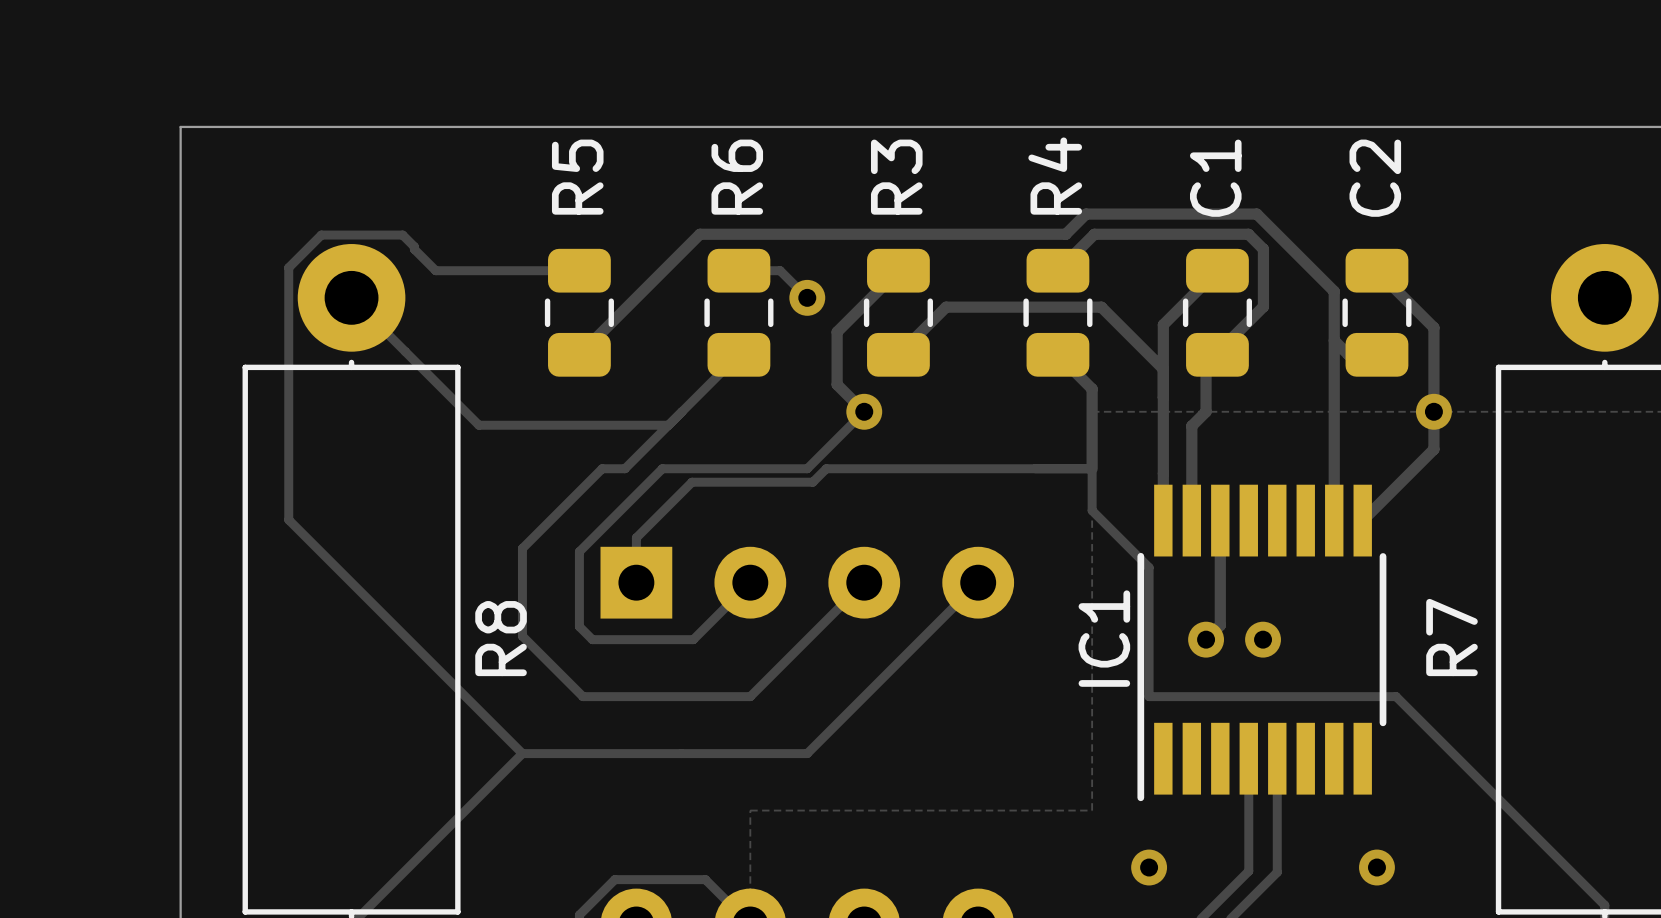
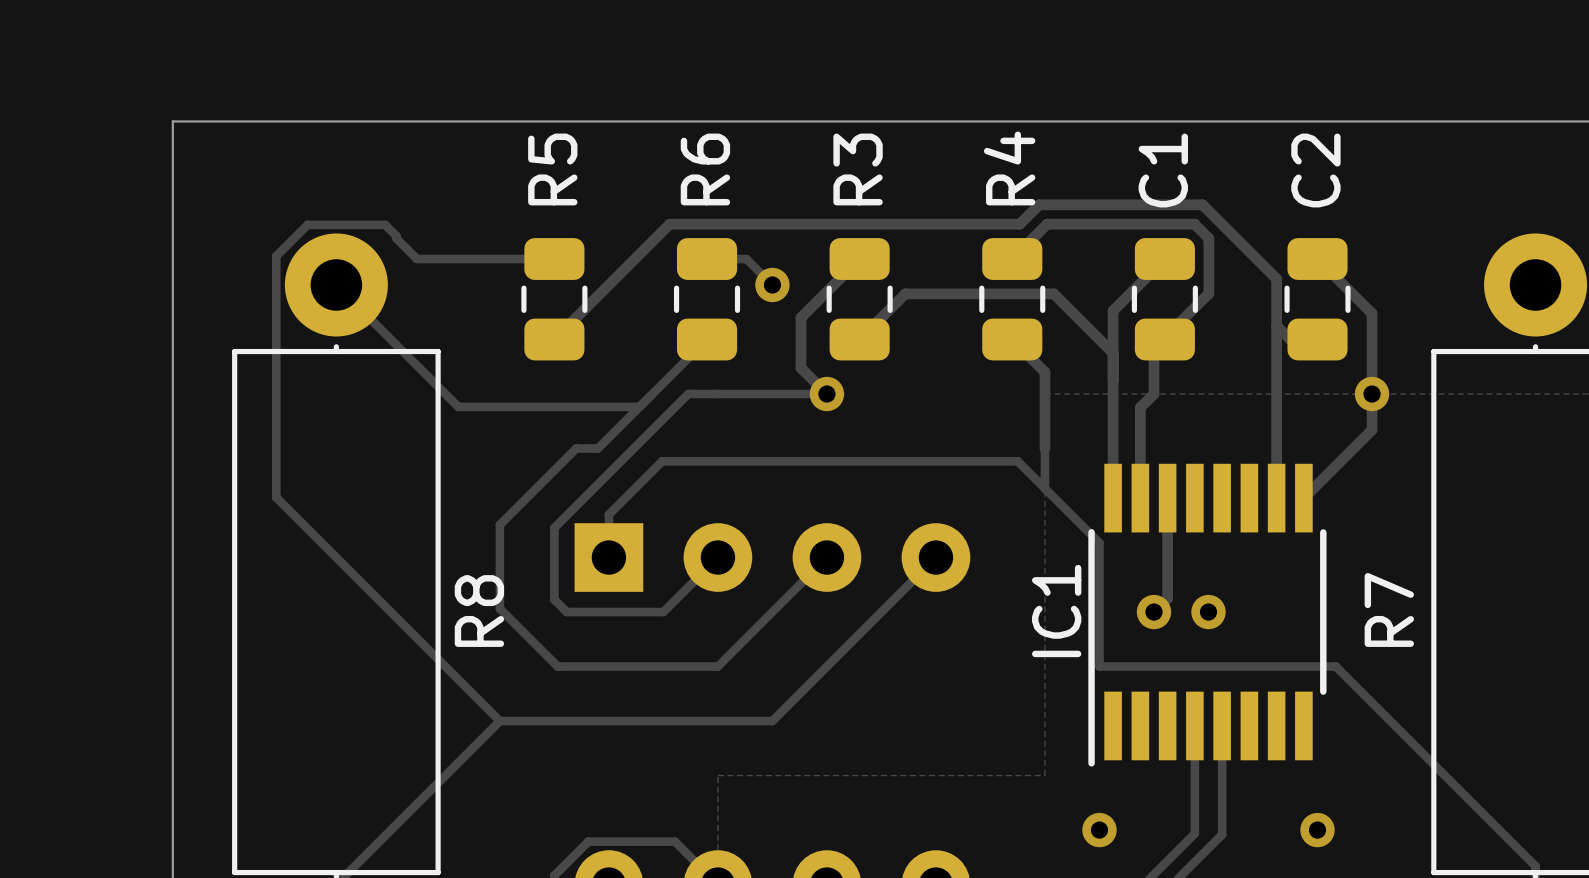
track: (864, 411) (807, 468) (662, 468) -> (826, 394) (688, 394) (633, 448)
track: (1092, 468) (826, 468) (812, 482) -> (1044, 488) (1017, 461) (777, 461)

